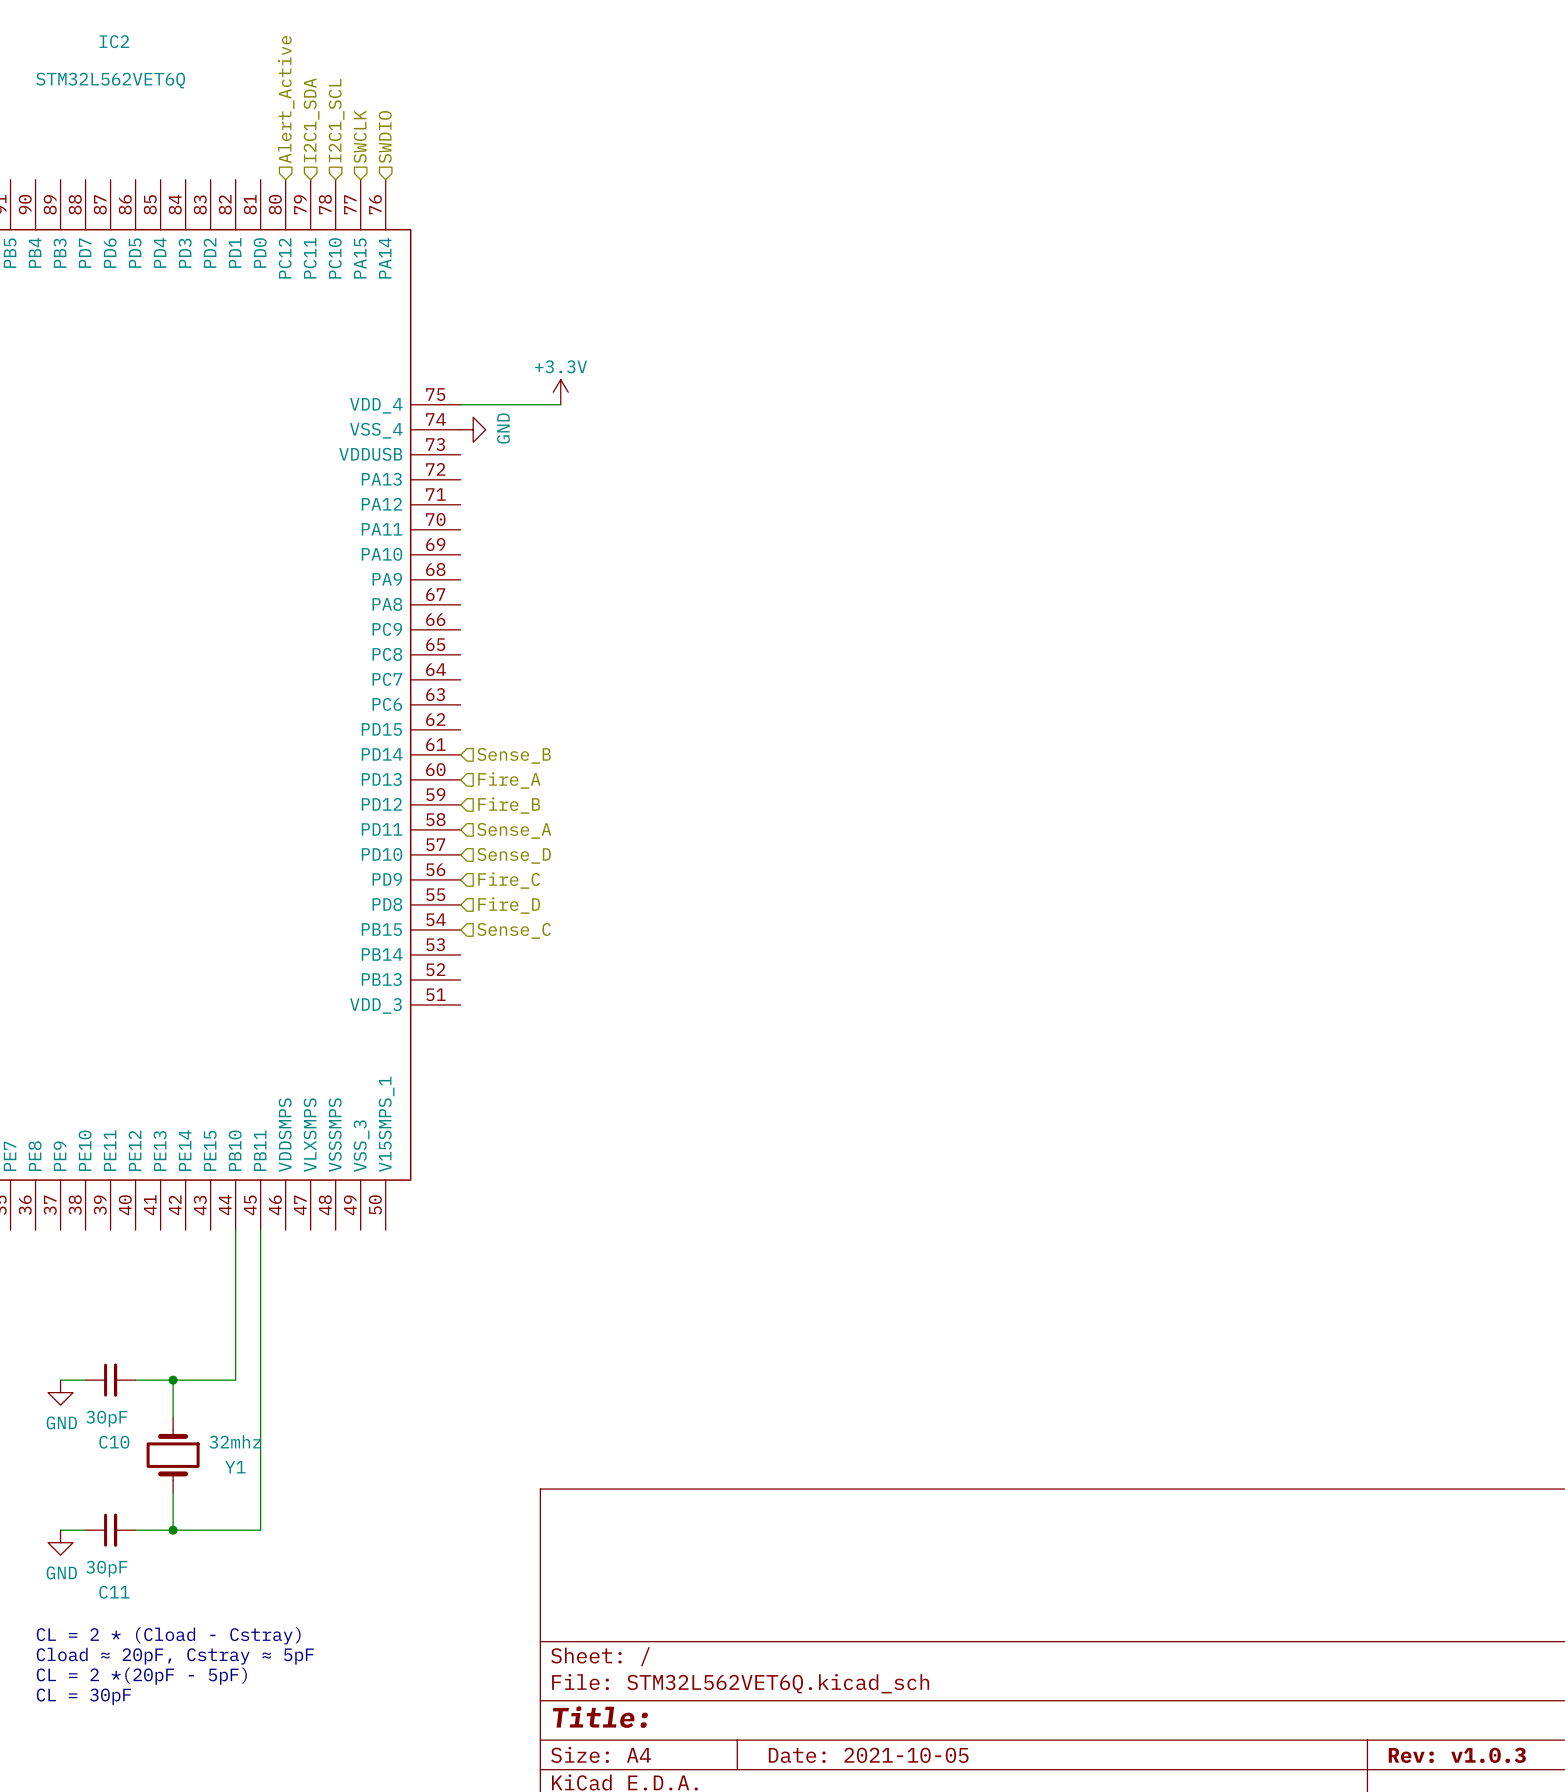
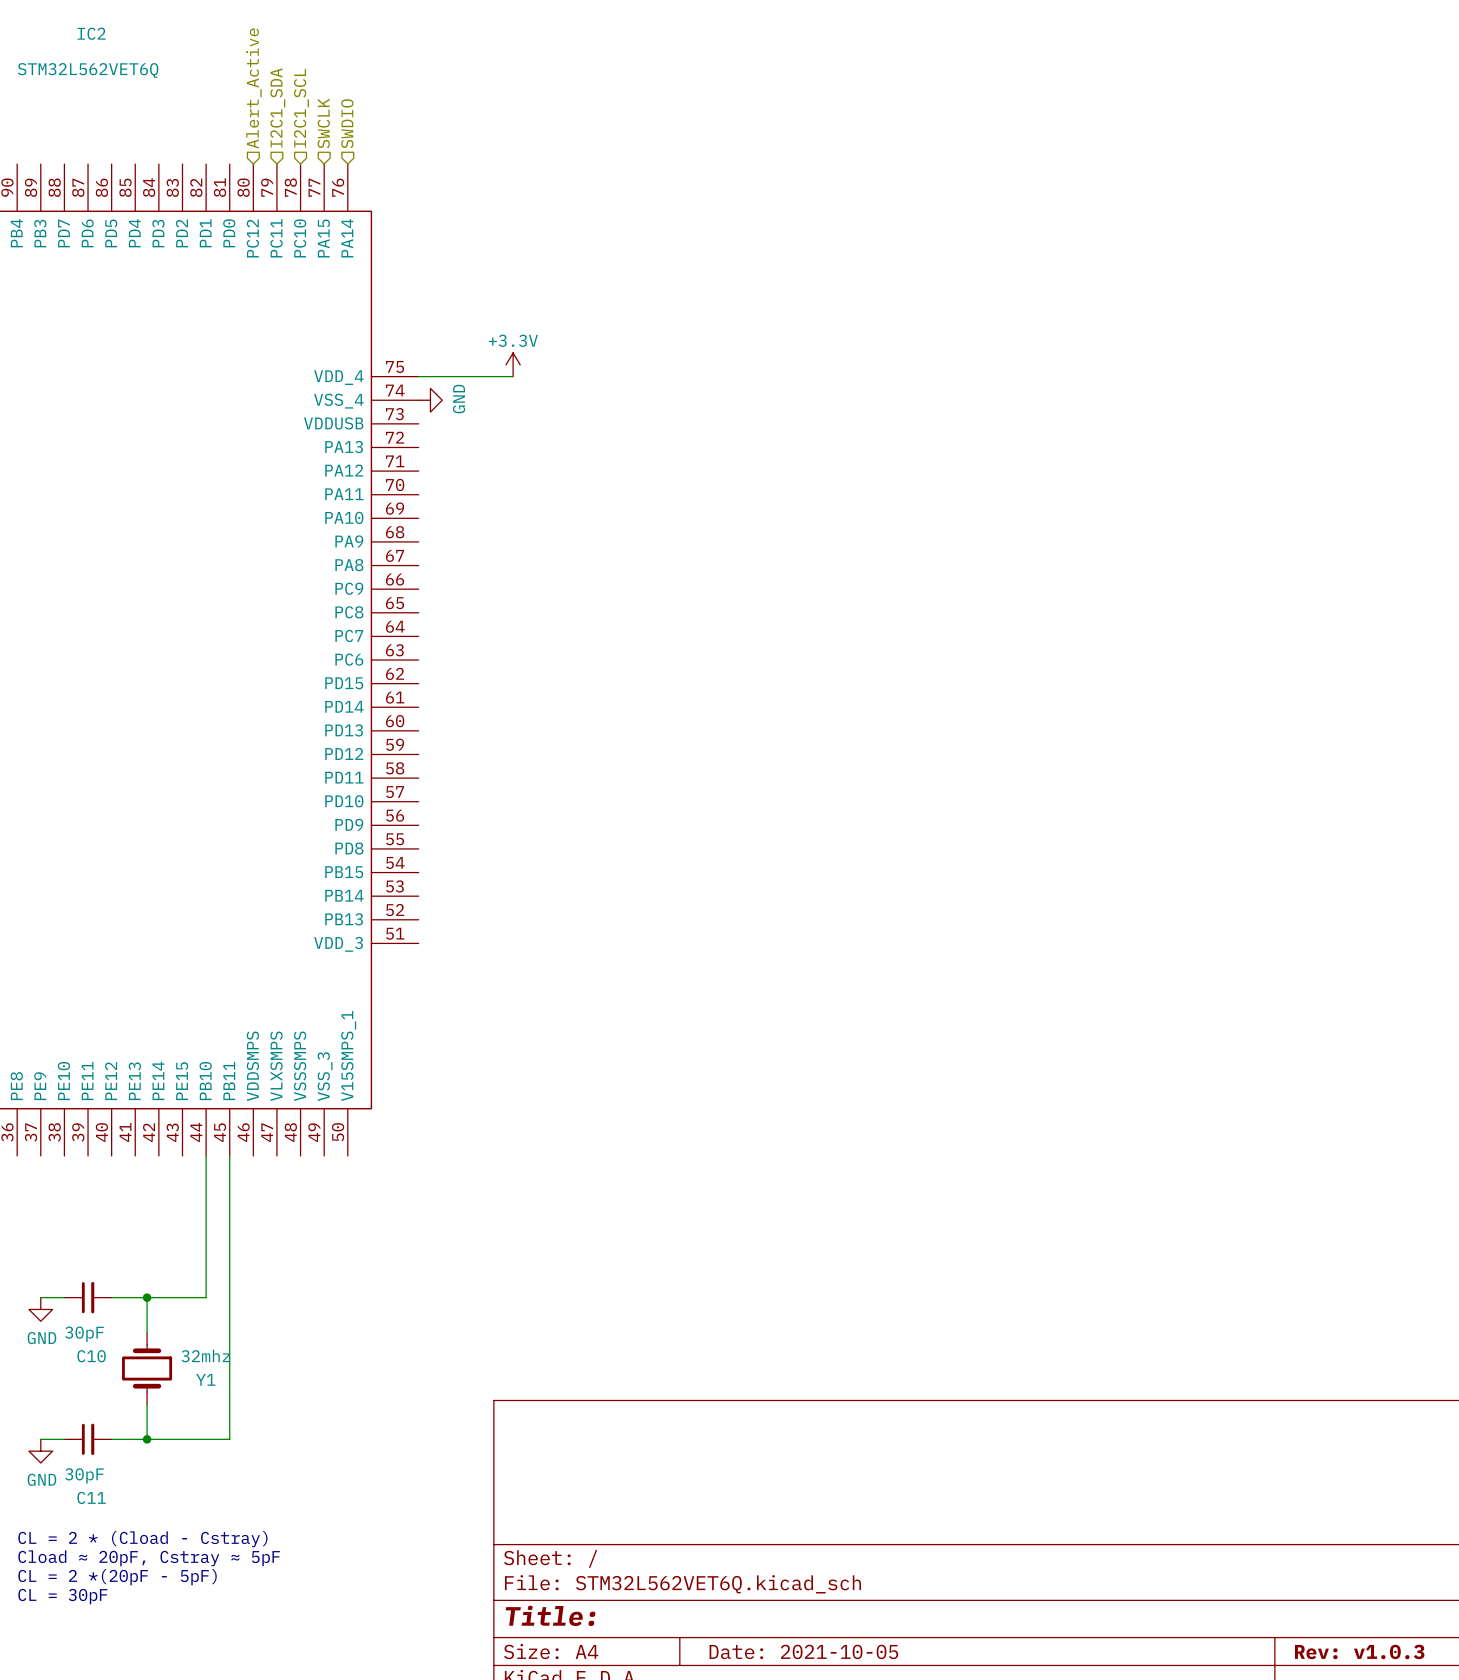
hierarchical label: Sense_B (514, 755) -> none
hierarchical label: Fire_A (509, 780) -> none
hierarchical label: Fire_B (509, 805) -> none
hierarchical label: Sense_A (514, 830) -> none
hierarchical label: Sense_D (514, 855) -> none
hierarchical label: Fire_C (509, 880) -> none
hierarchical label: Fire_D (509, 905) -> none
hierarchical label: Sense_C (514, 930) -> none

